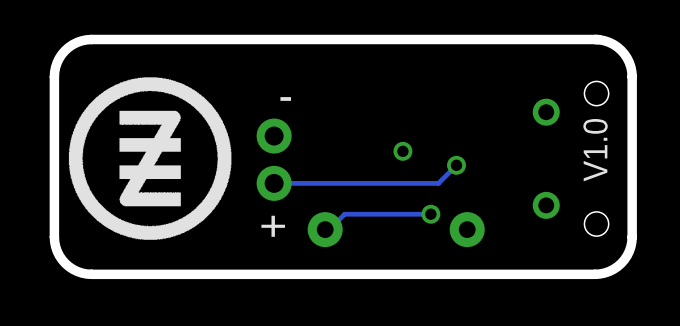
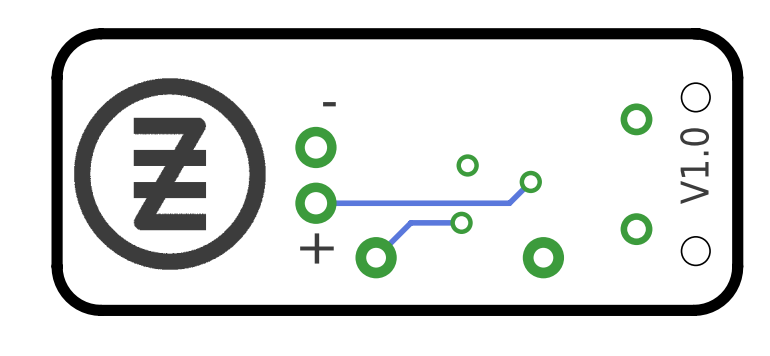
track: (430, 214) (344, 214) (330, 228) (325, 229) -> (461, 222) (410, 222) (376, 257)
via position: (430, 214) -> (461, 222)

